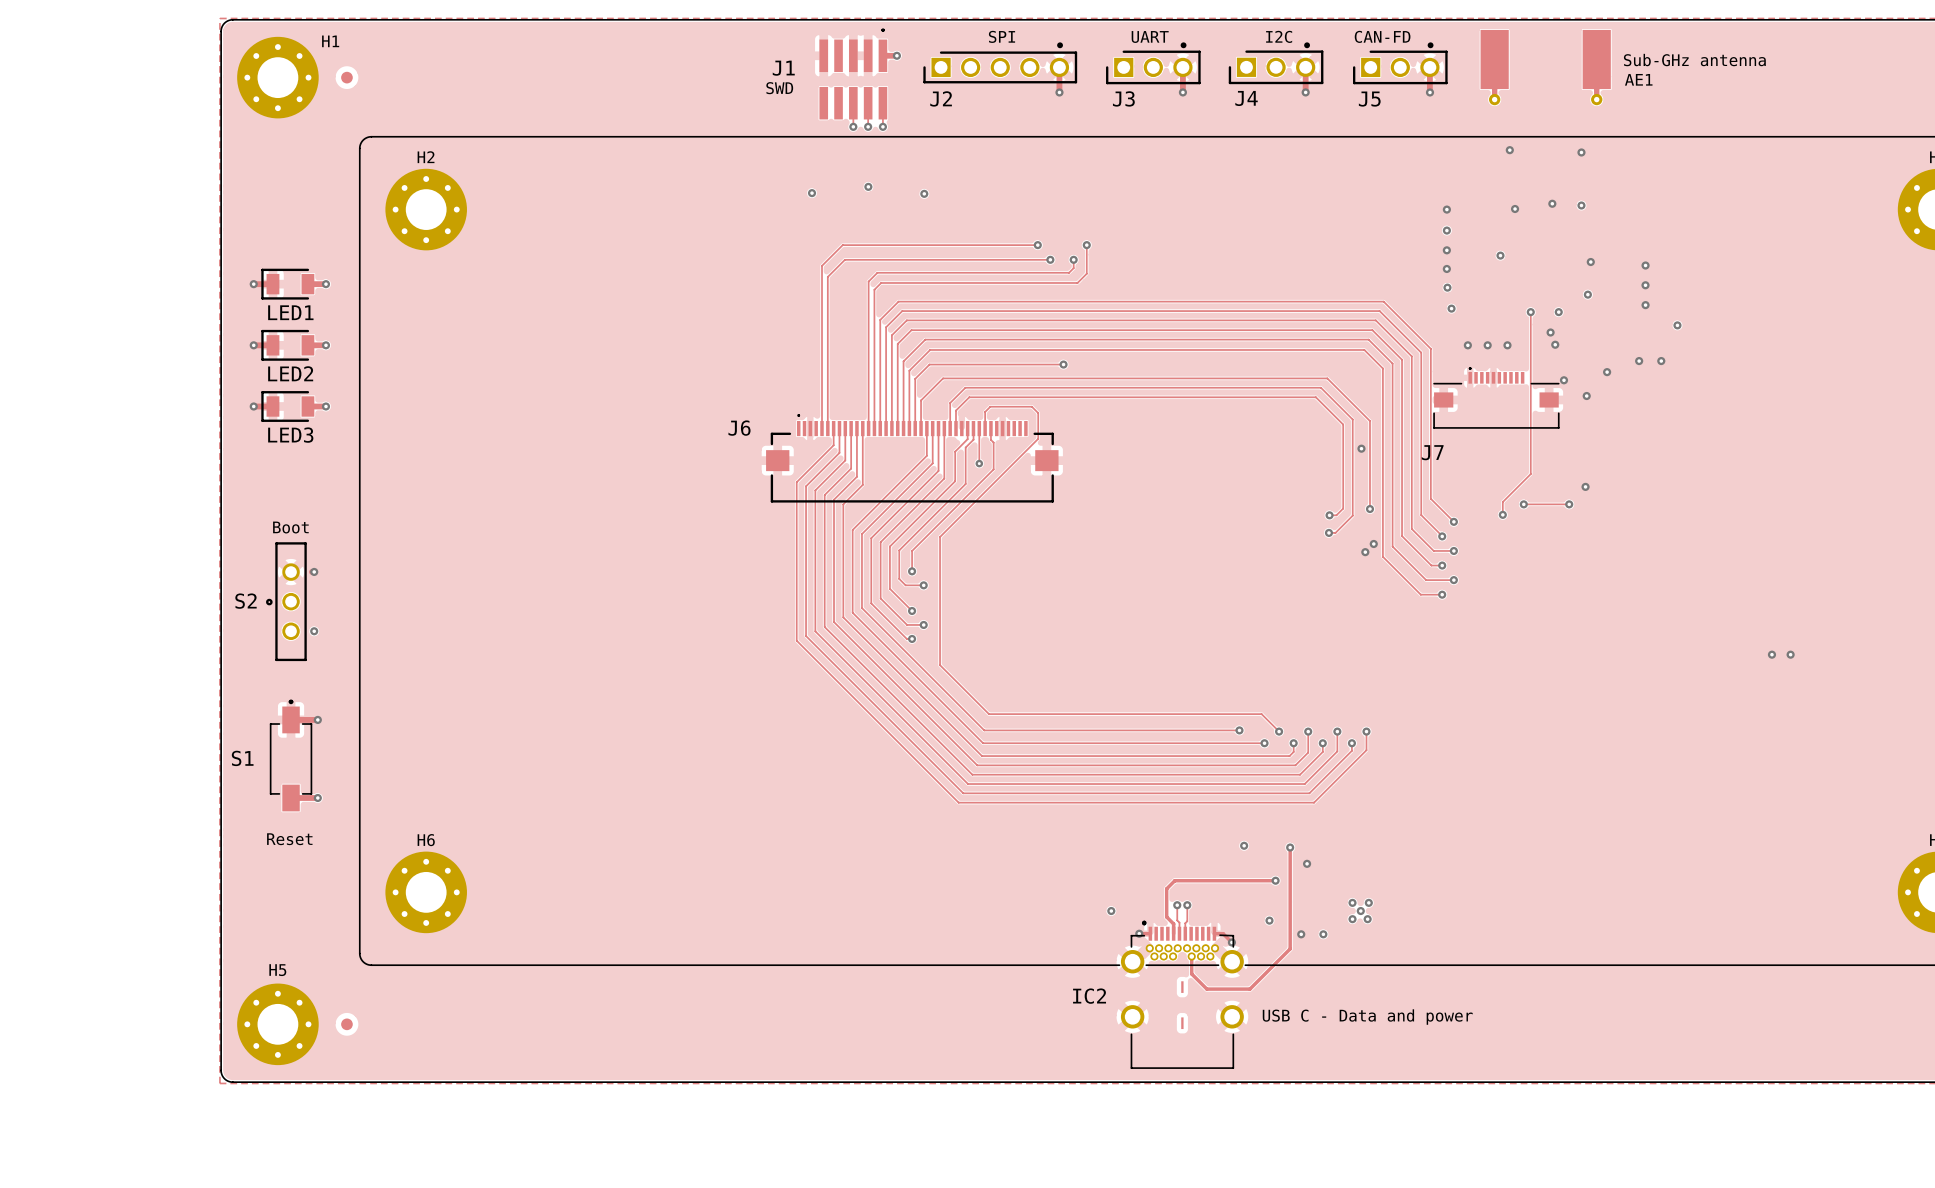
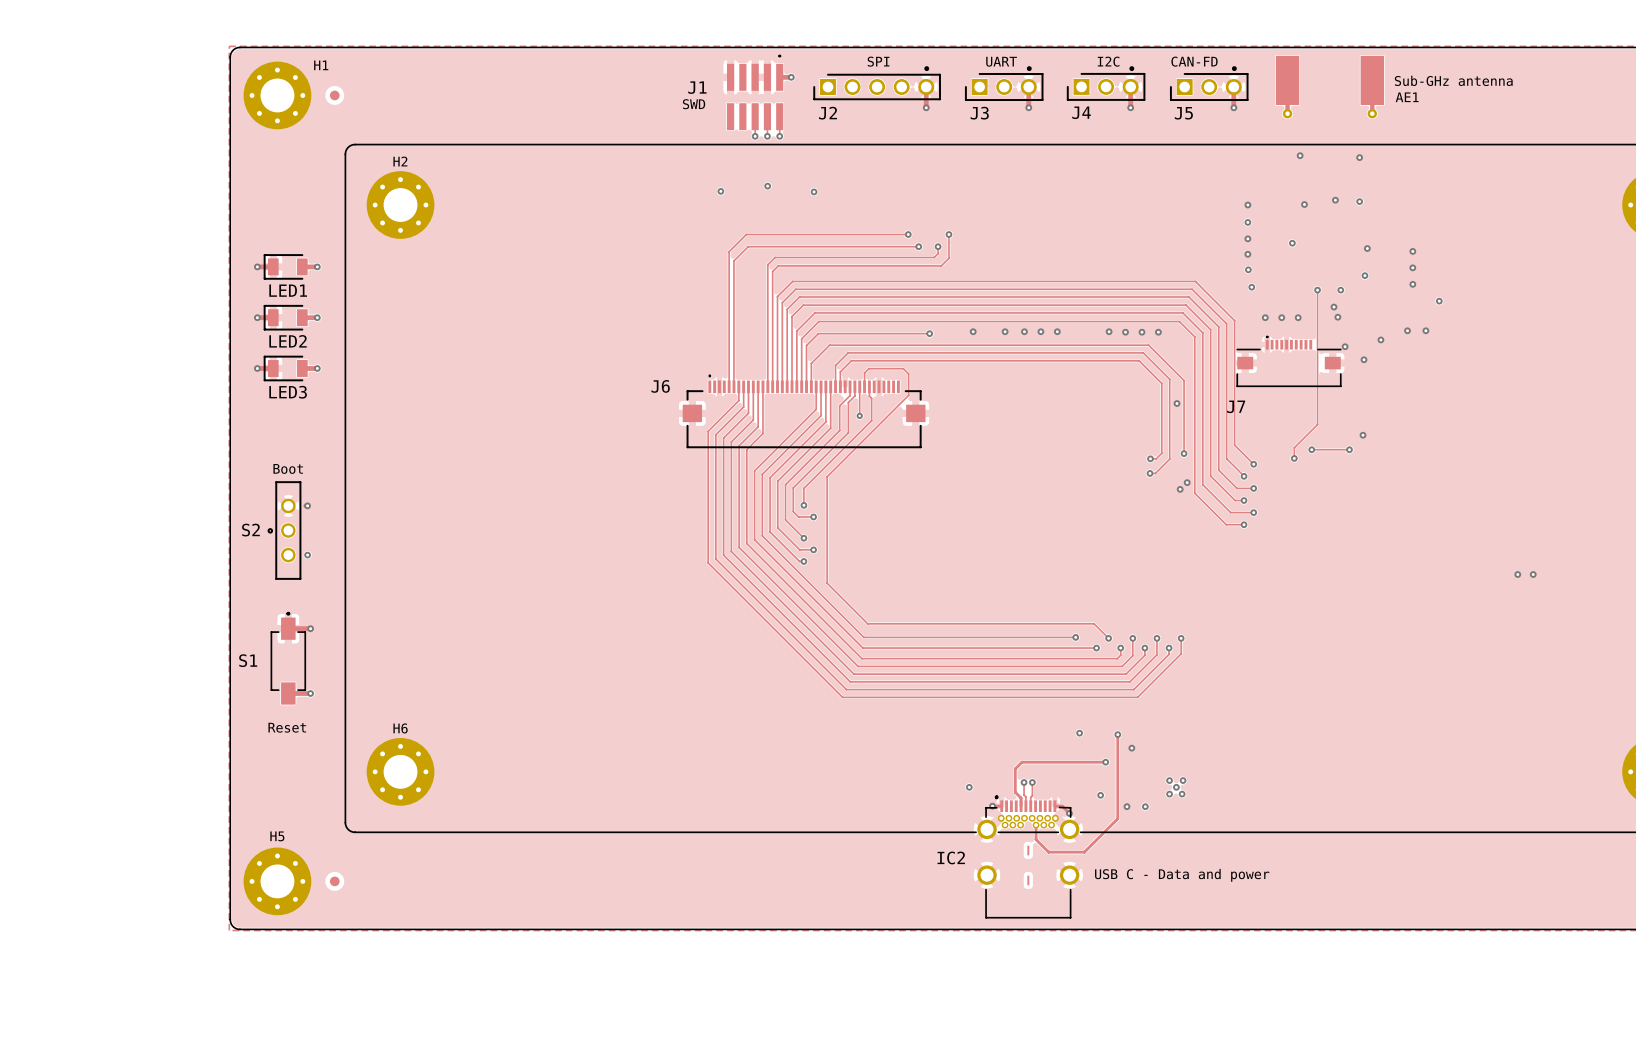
via: none -> (973, 331)
via: none -> (1005, 331)
via: none -> (1024, 331)
via: none -> (1040, 331)
via: none -> (1057, 331)
via: none -> (1109, 331)
via: none -> (1125, 332)
via: none -> (1141, 332)
via: none -> (1158, 332)

